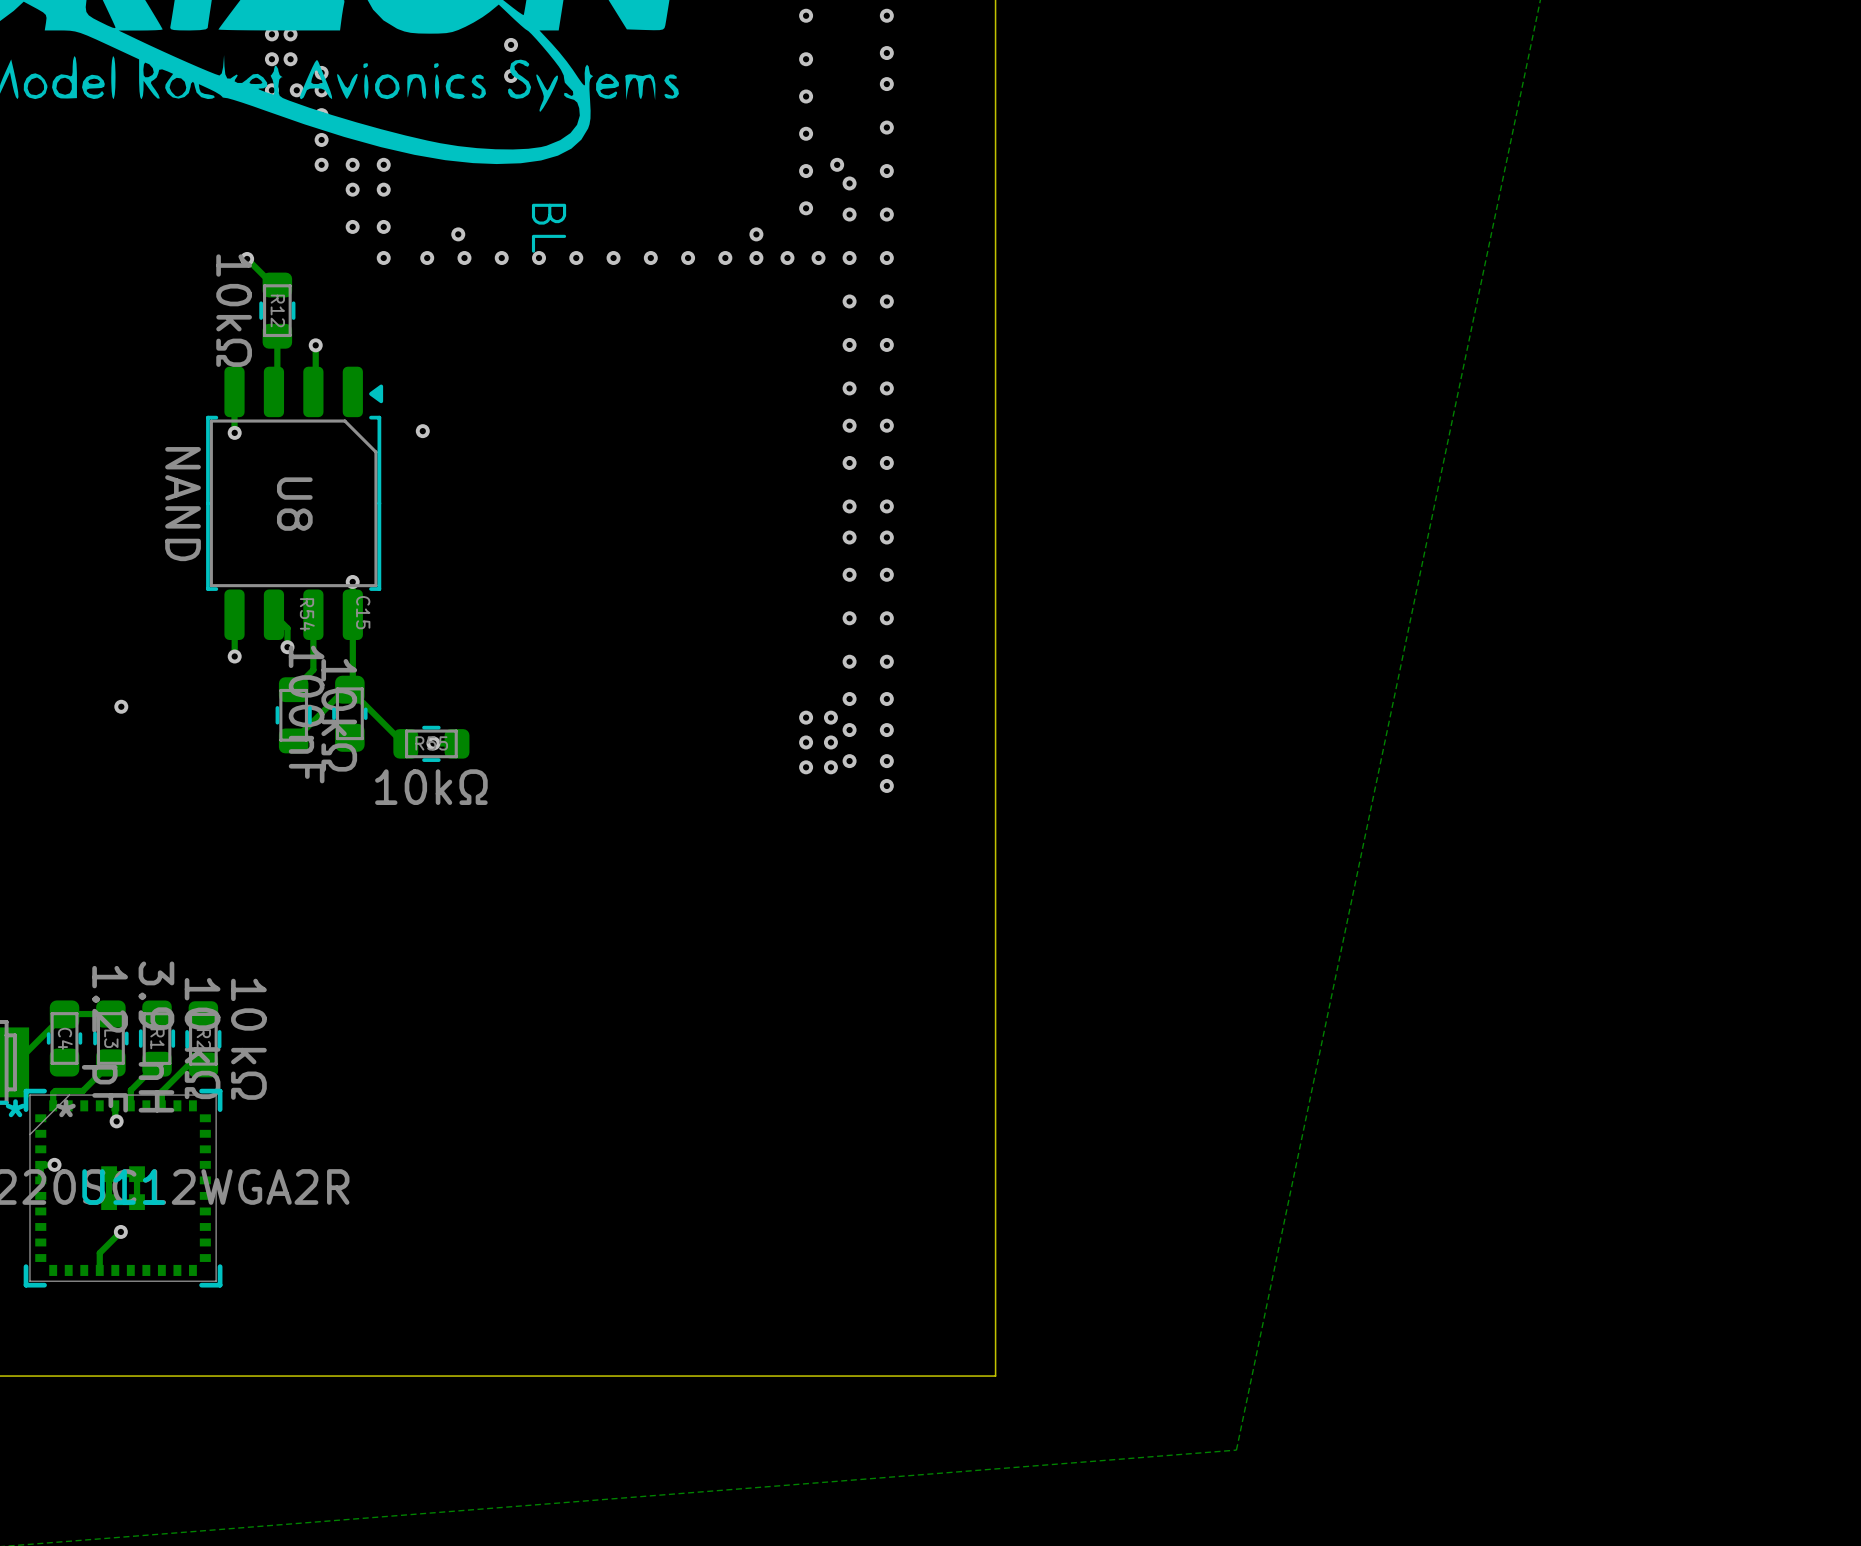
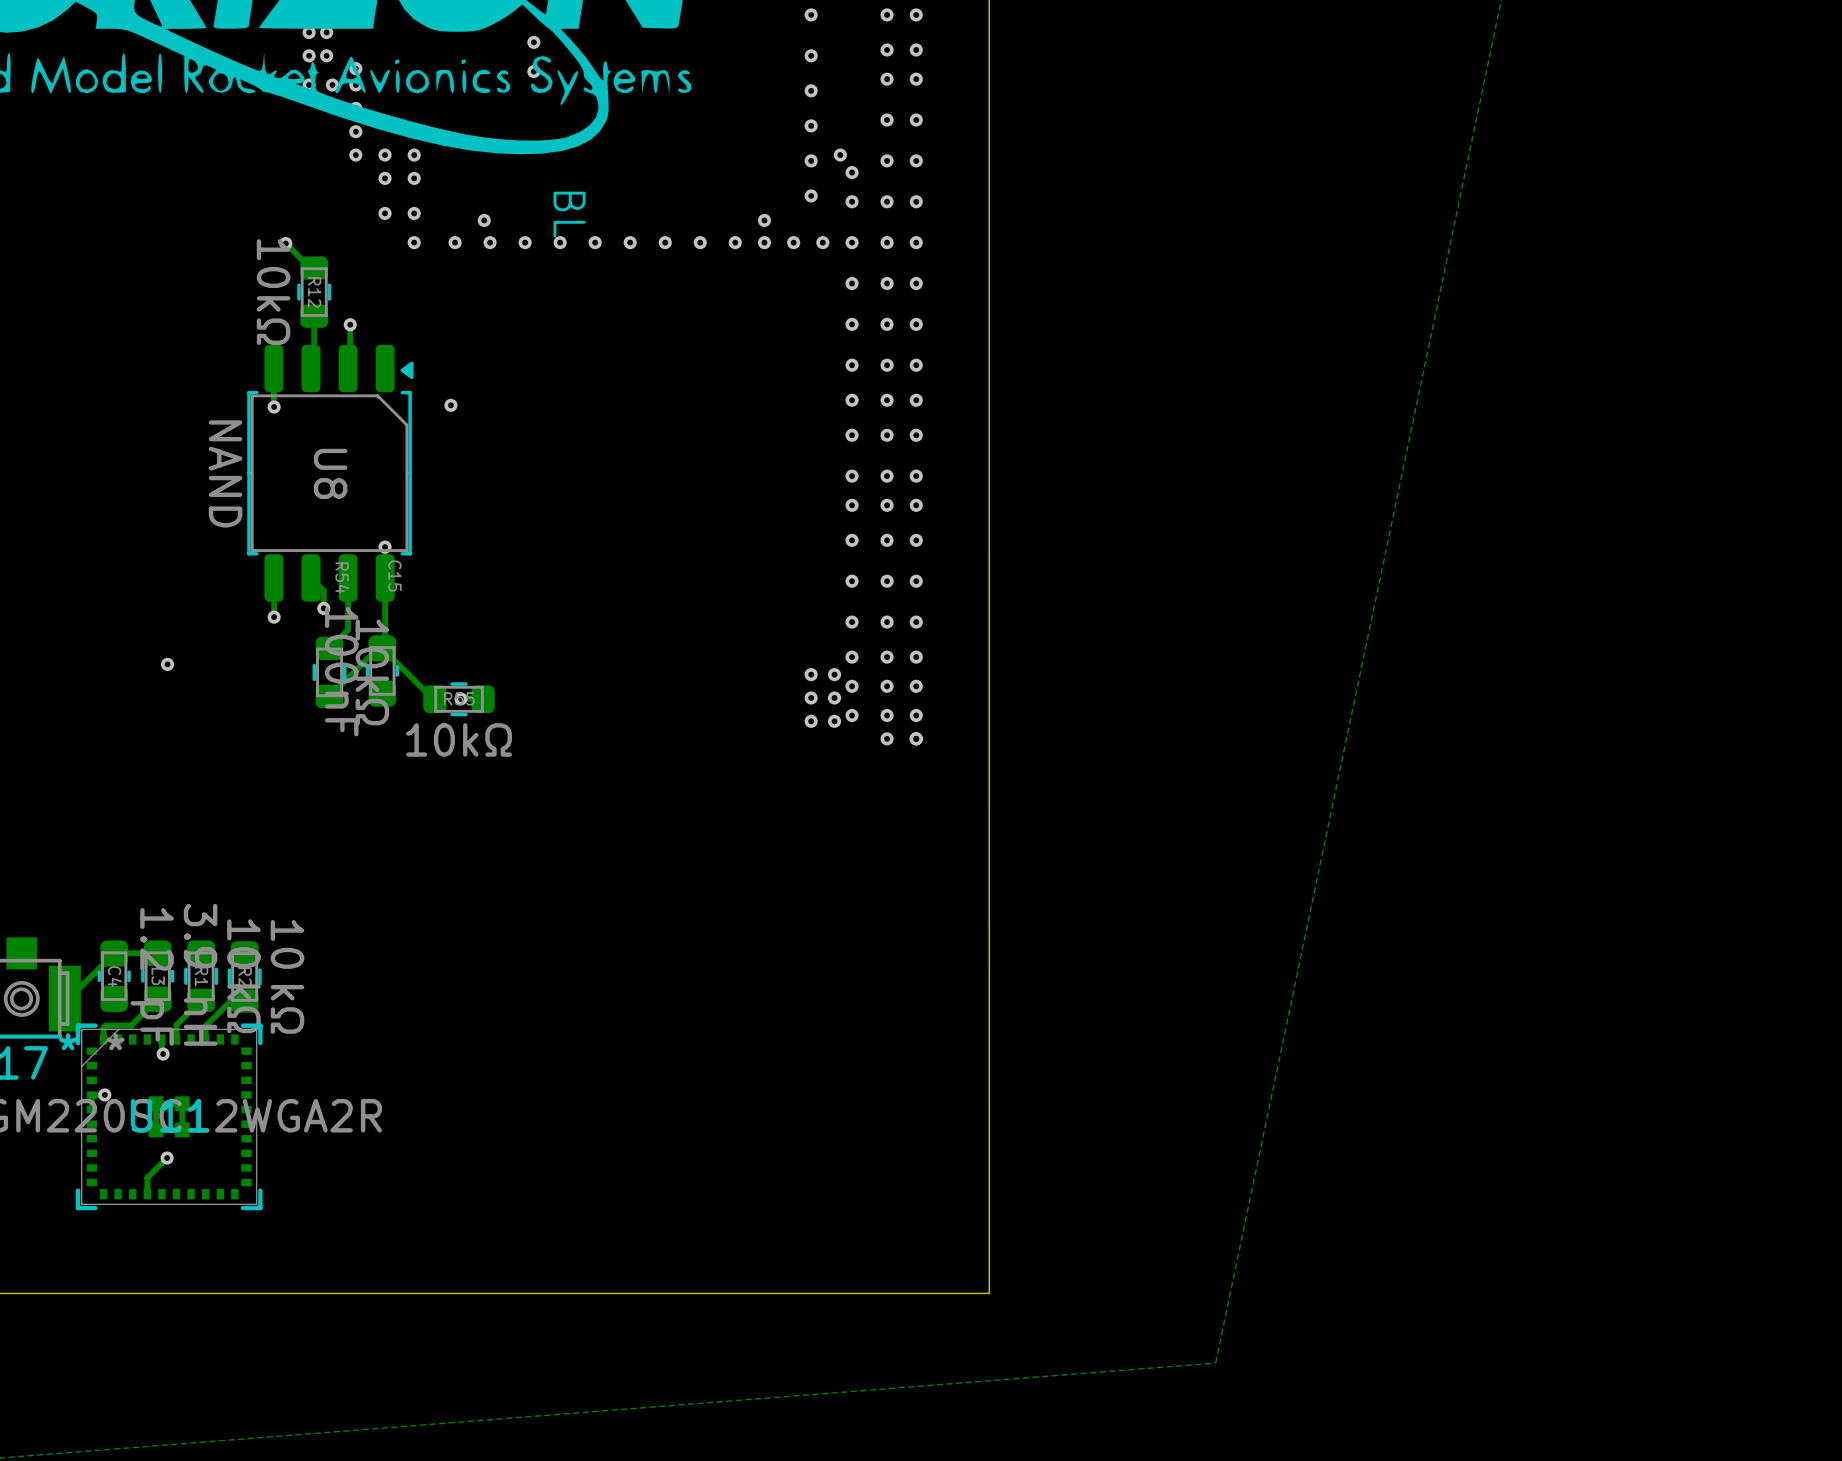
via: none -> (916, 14)
via: none -> (916, 49)
via: none -> (916, 79)
via: none -> (916, 120)
via: none -> (916, 160)
via: none -> (916, 201)
via: none -> (916, 242)
via: none -> (916, 283)
via: none -> (916, 324)
via: none -> (916, 365)
via: none -> (916, 400)
via: none -> (916, 435)
via: none -> (916, 476)
via: none -> (916, 505)
via: none -> (916, 540)
via: none -> (916, 581)
via: none -> (916, 622)
via: none -> (916, 657)
via: none -> (916, 686)
via: none -> (916, 715)
via: none -> (916, 738)

